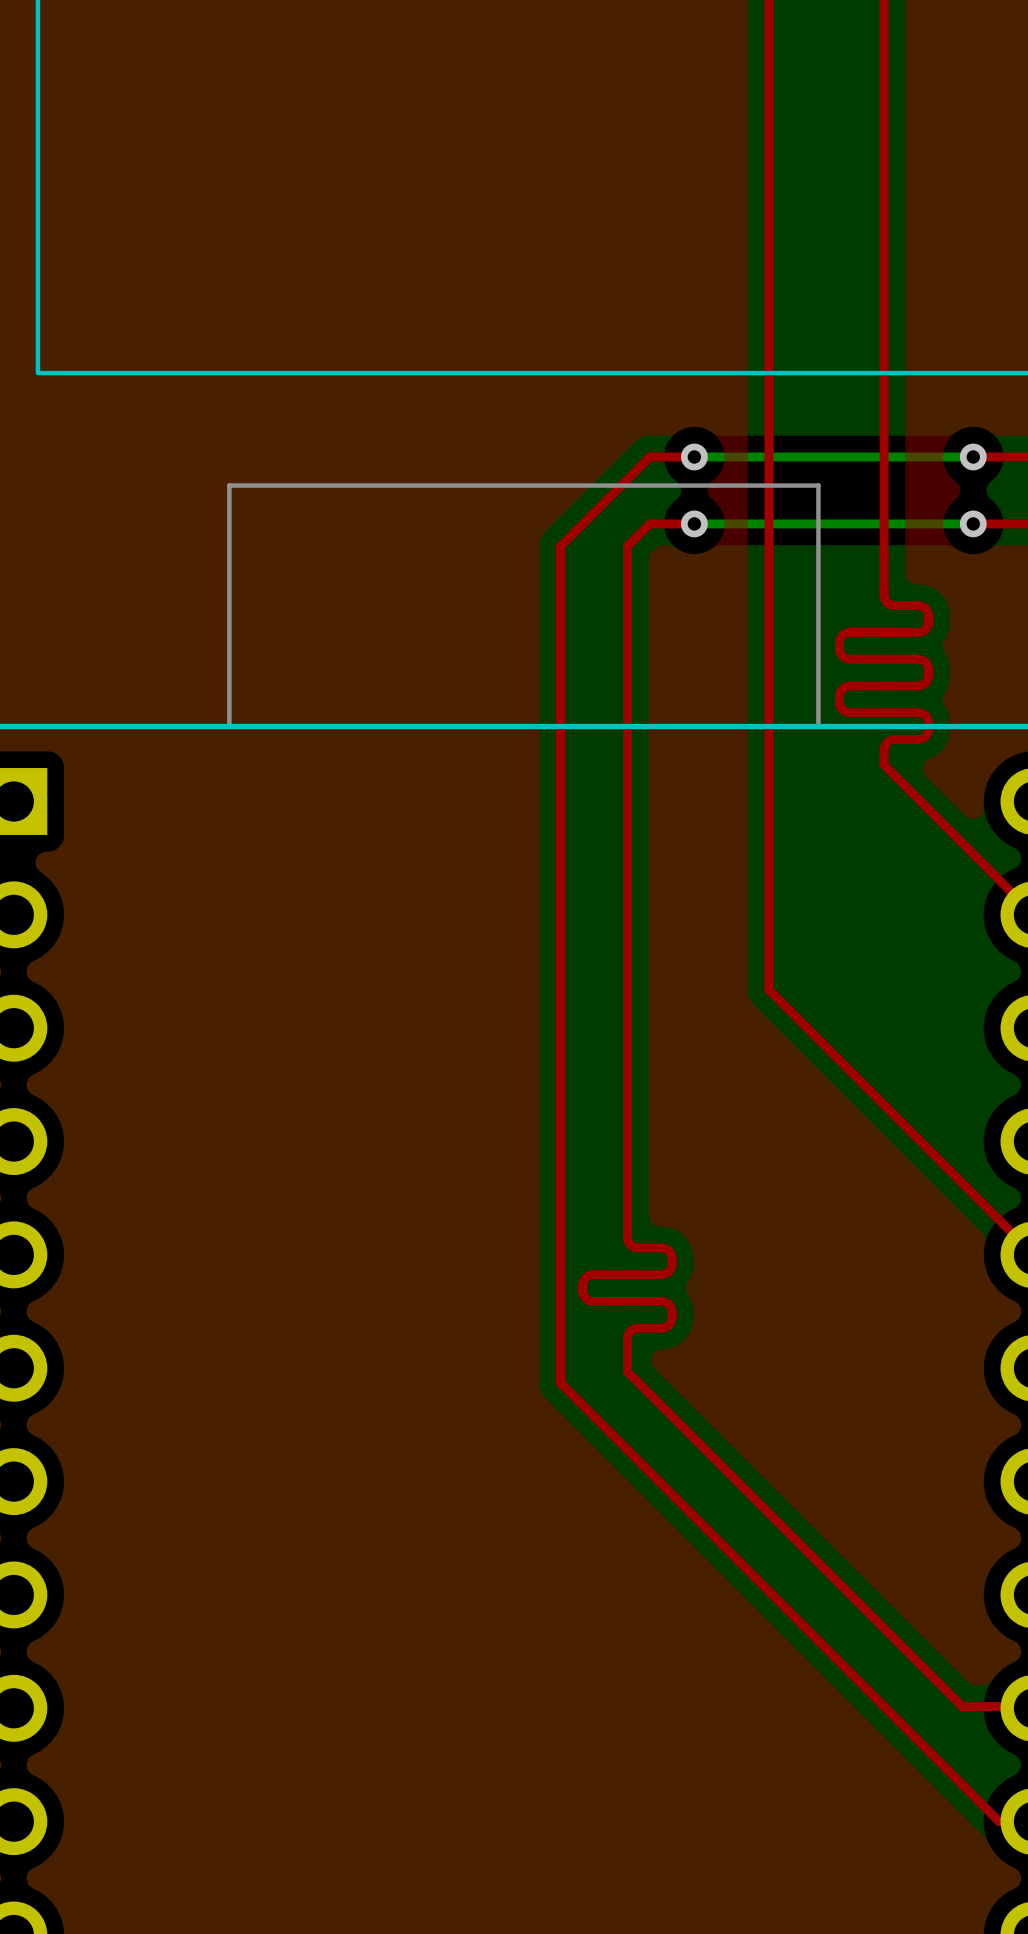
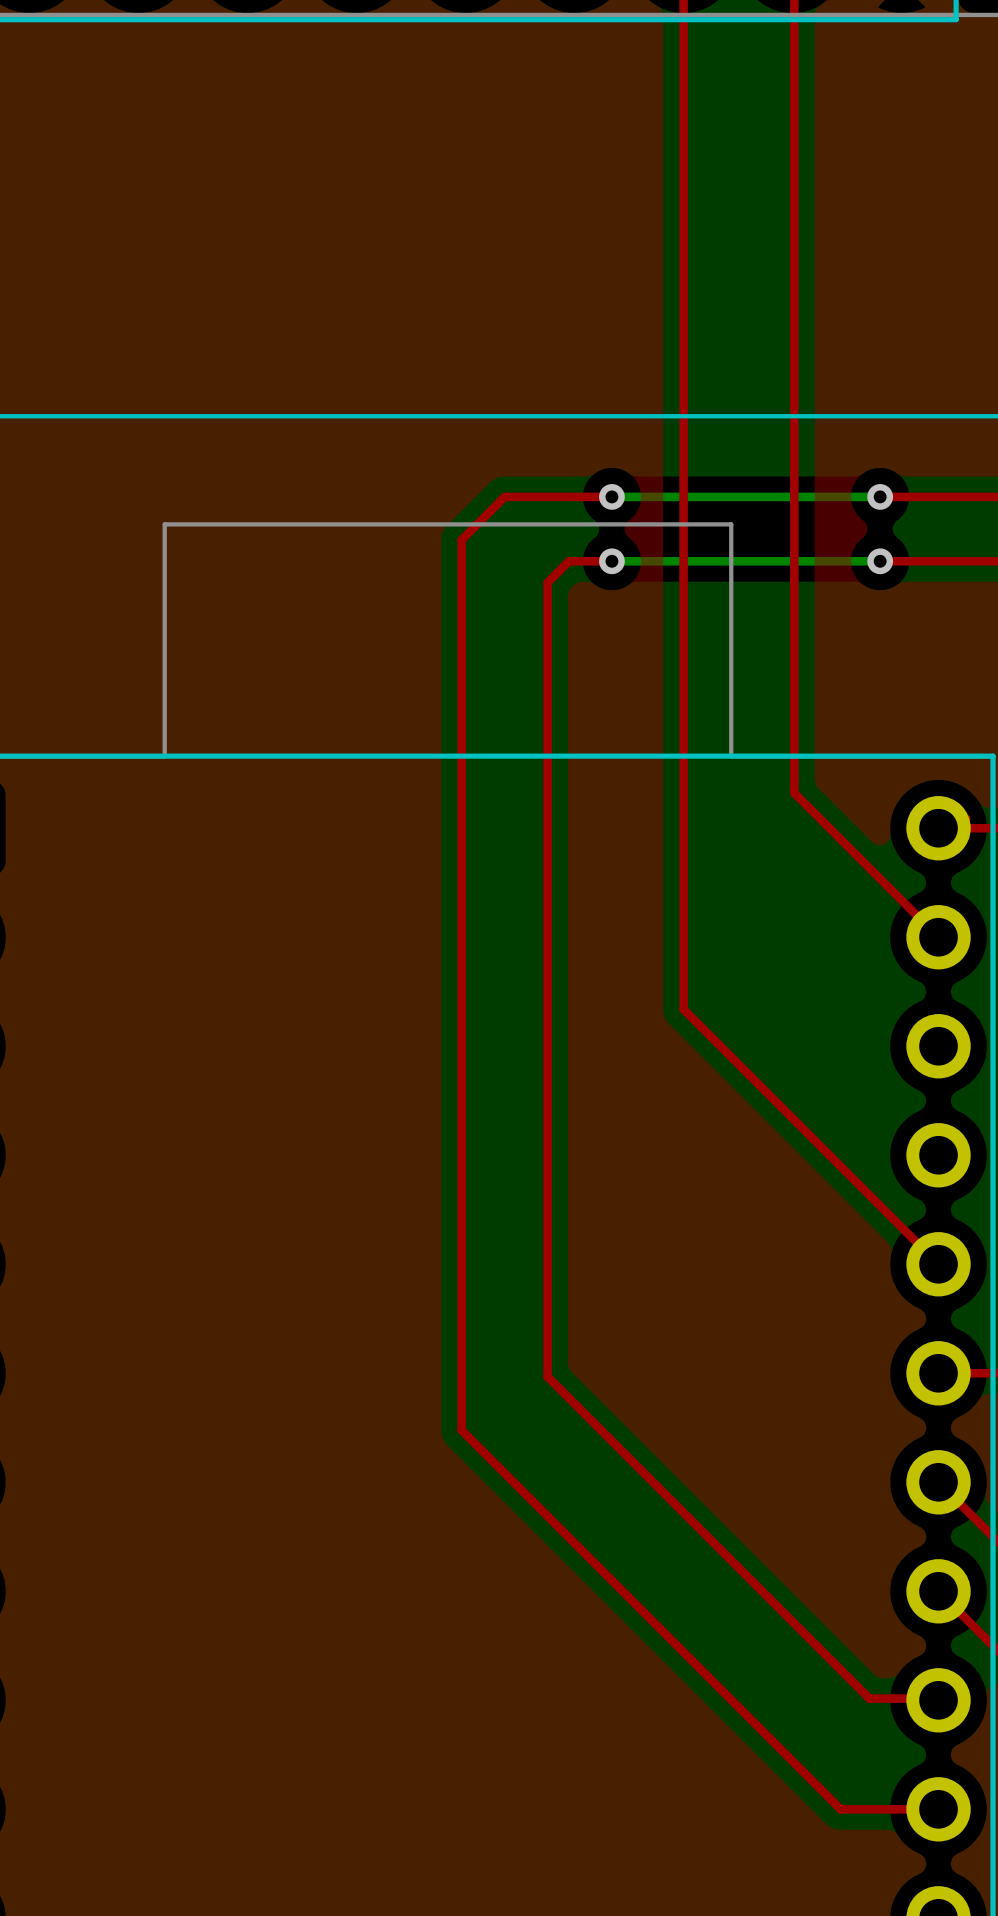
top track: (649, 456) (560, 546) (560, 1382) (999, 1821) -> (569, 496) (504, 496) (461, 539) (461, 1430) (840, 1809) (905, 1809)
top track: (884, 594) (886, 601) (891, 605) (922, 606) (927, 610) (928, 616) (927, 626) (920, 632) (848, 632) (843, 634) (840, 639) (840, 652) (846, 658) (919, 659) (924, 661) (928, 666) (928, 678) (921, 685) (848, 686) (840, 692) (840, 705) (846, 712) (919, 712) (926, 716) (928, 730) (924, 737) (919, 739) (891, 740) (885, 744) (884, 750) -> (794, 629) (794, 778)
top track: (627, 1237) (629, 1242) (633, 1246) (664, 1248) (670, 1252) (672, 1258) (671, 1268) (663, 1274) (592, 1274) (584, 1279) (583, 1293) (589, 1300) (662, 1301) (669, 1305) (671, 1318) (668, 1325) (662, 1328) (634, 1328) (629, 1332) (627, 1338) -> (547, 1247) (547, 1345)

